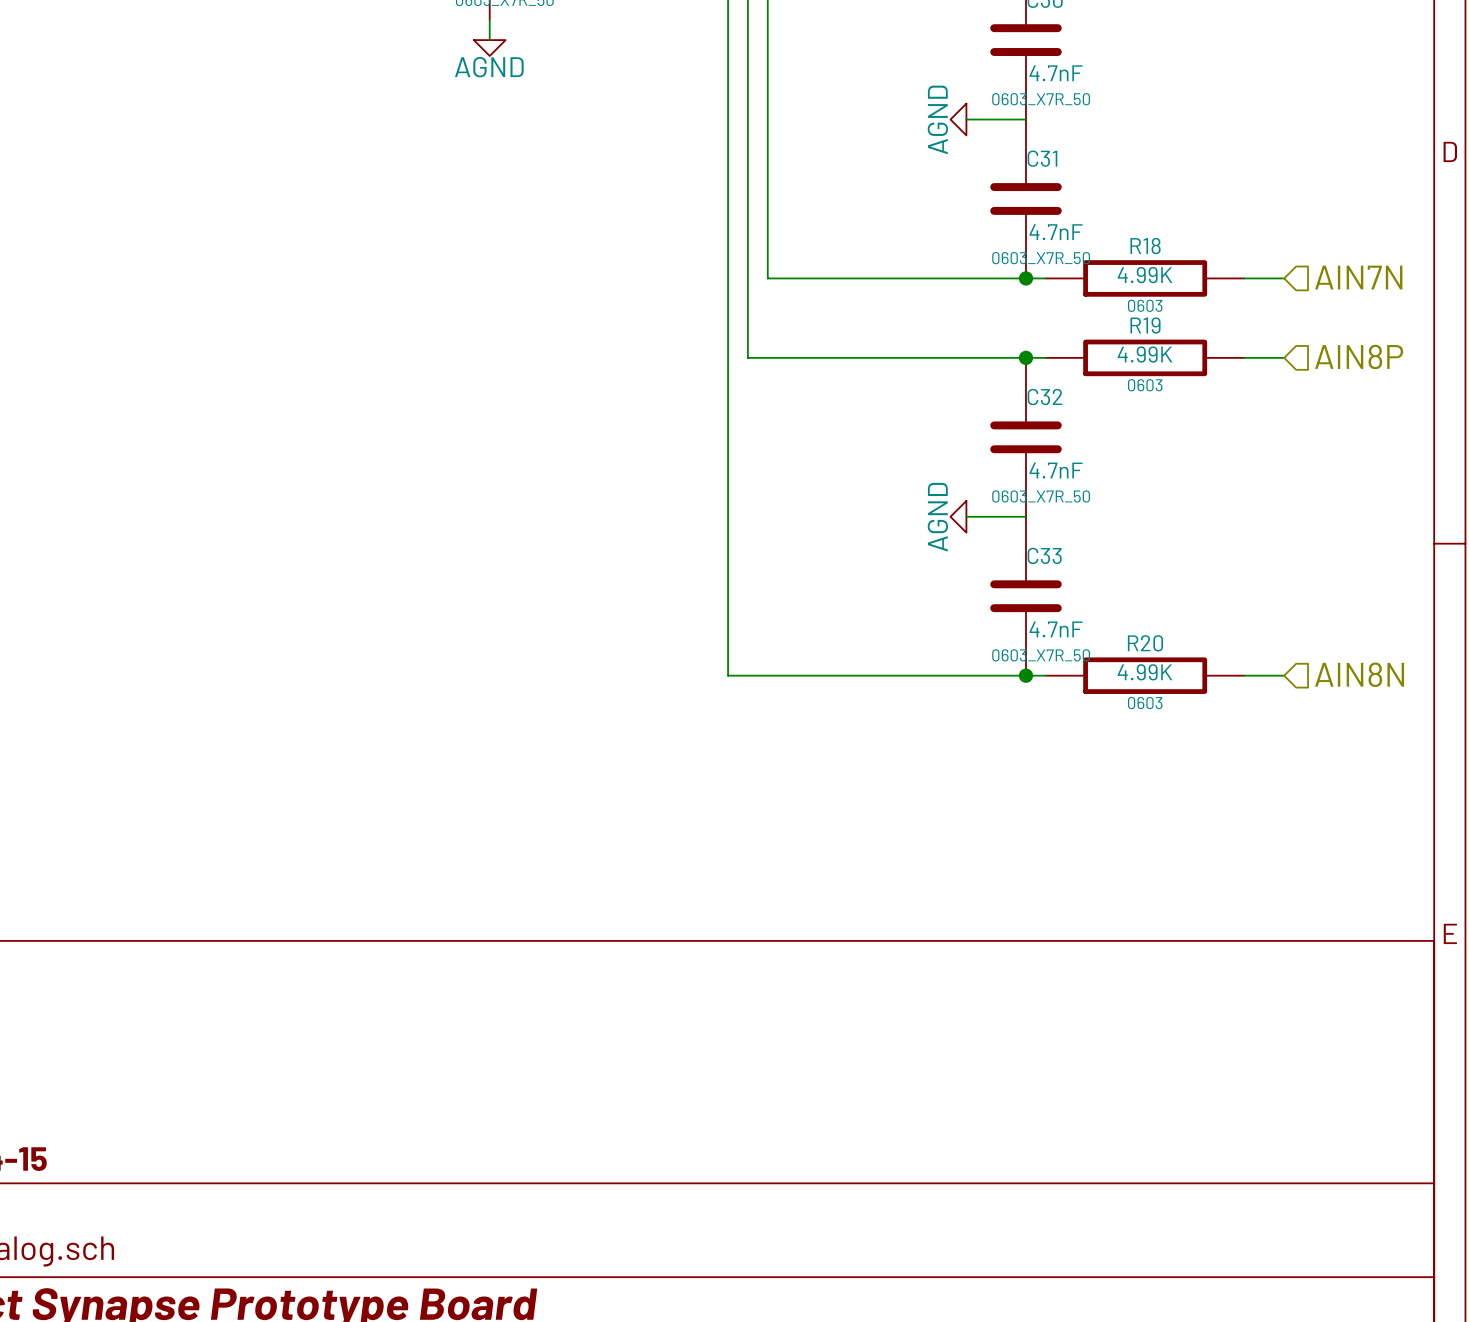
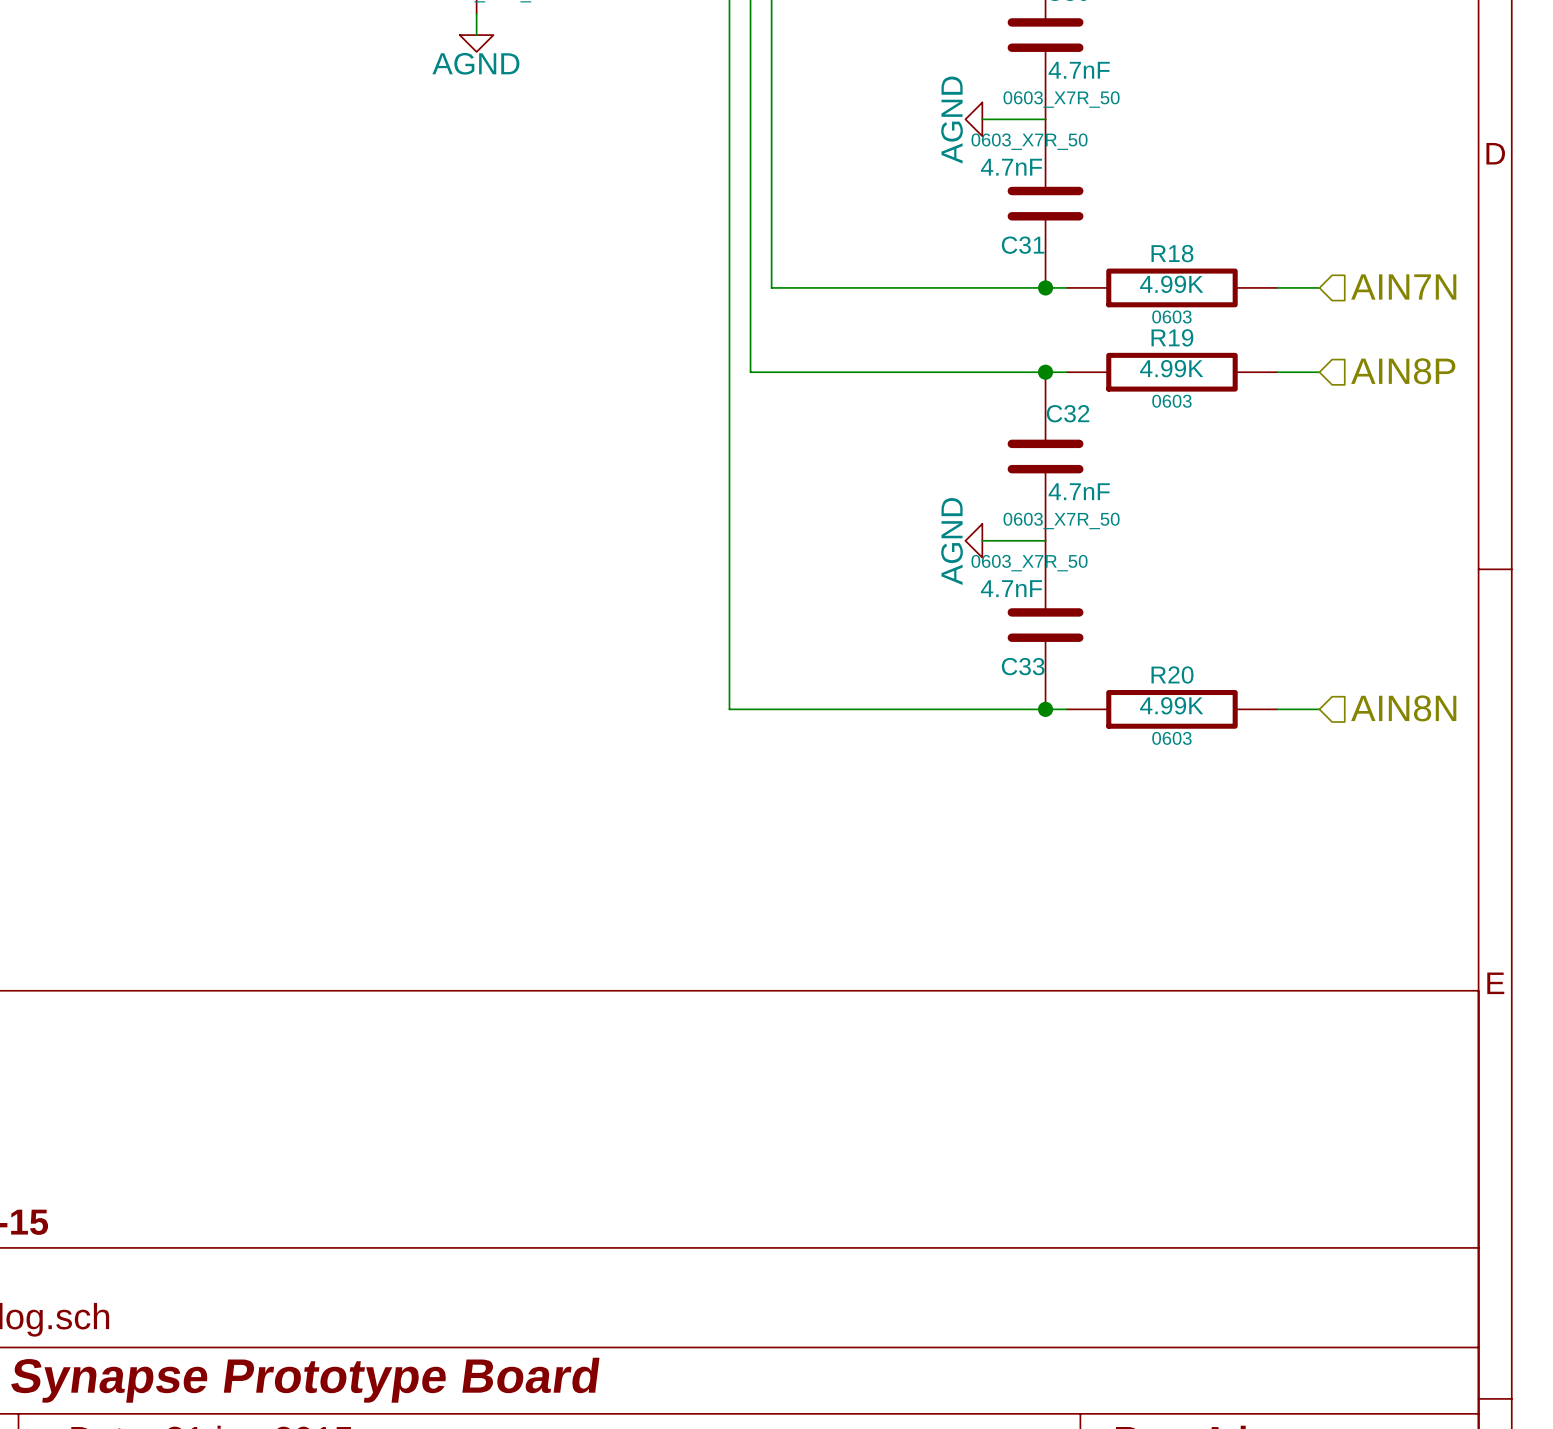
C31 name position: C31 (1042, 158) -> C31 (1023, 245)
C31 value position: 4.7nF (1056, 232) -> 4.7nF (1011, 167)
C31 text position: 0603_X7R_50 (1041, 258) -> 0603_X7R_50 (1029, 141)
C33 name position: C33 (1044, 555) -> C33 (1023, 666)
C33 value position: 4.7nF (1056, 629) -> 4.7nF (1011, 588)
C33 text position: 0603_X7R_50 (1041, 655) -> 0603_X7R_50 (1029, 563)

